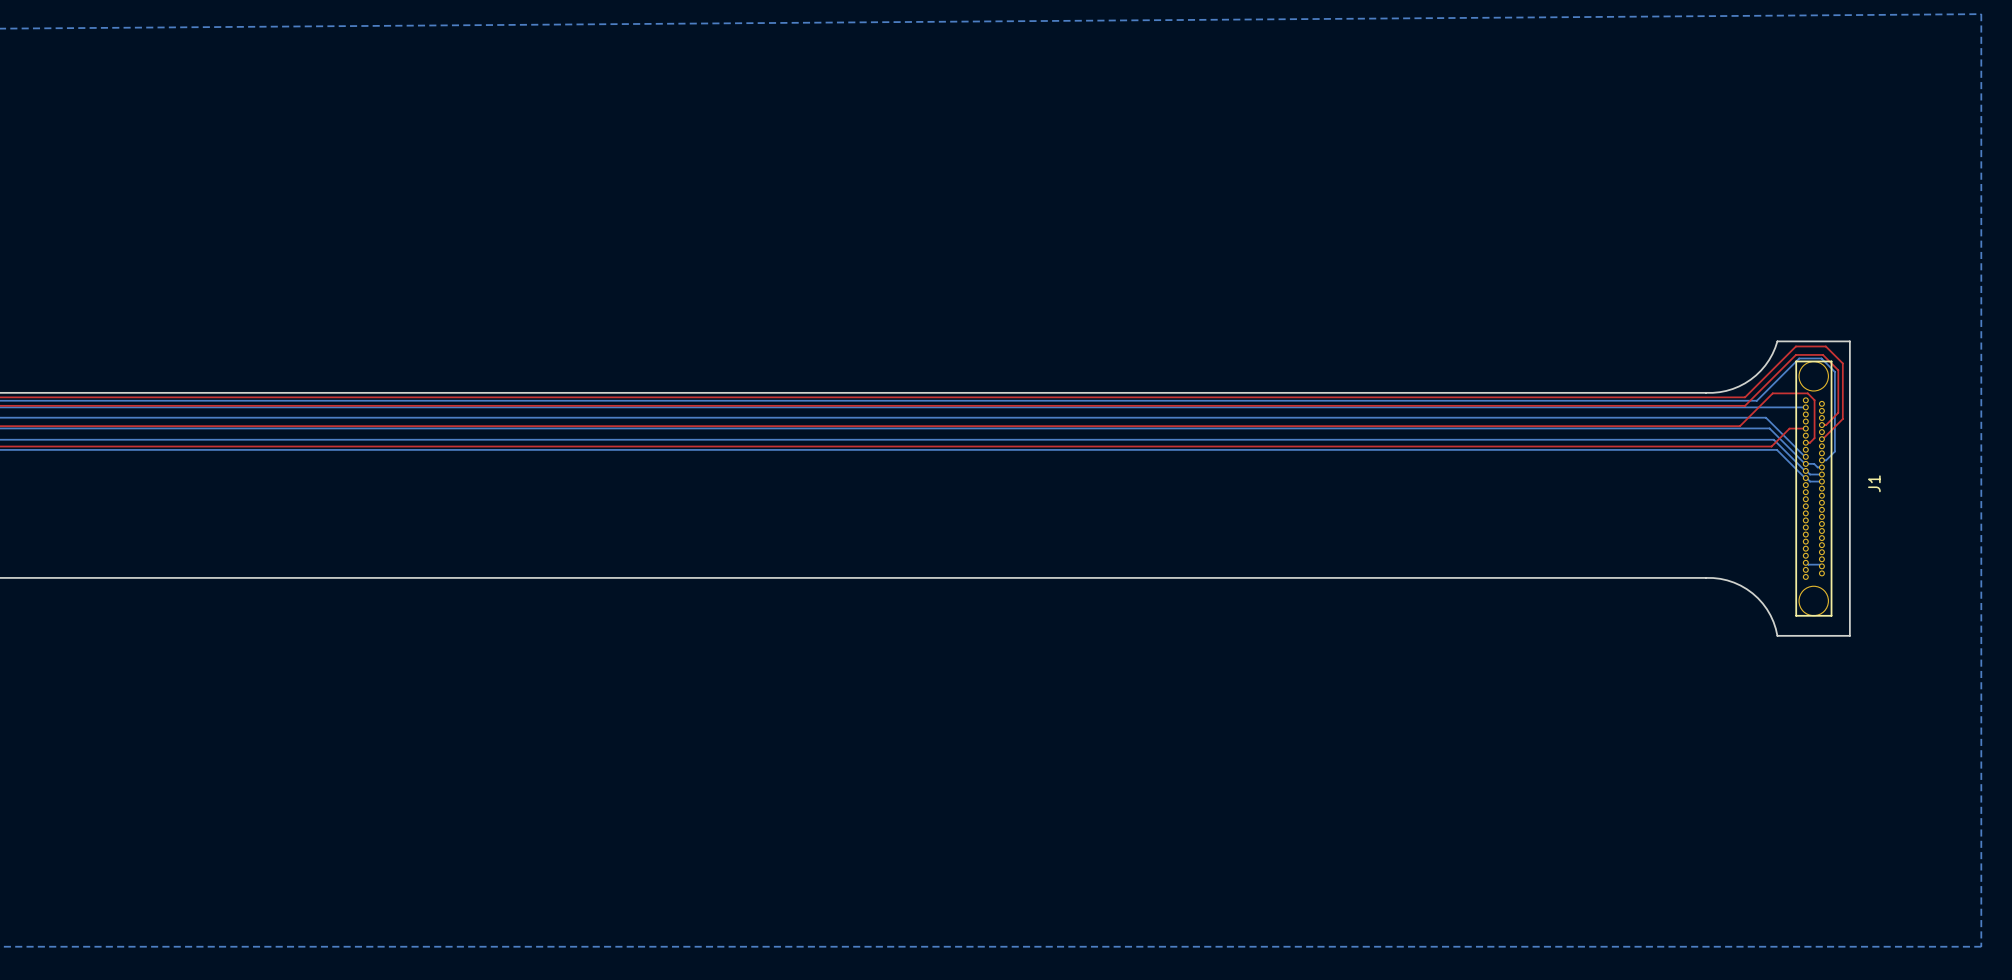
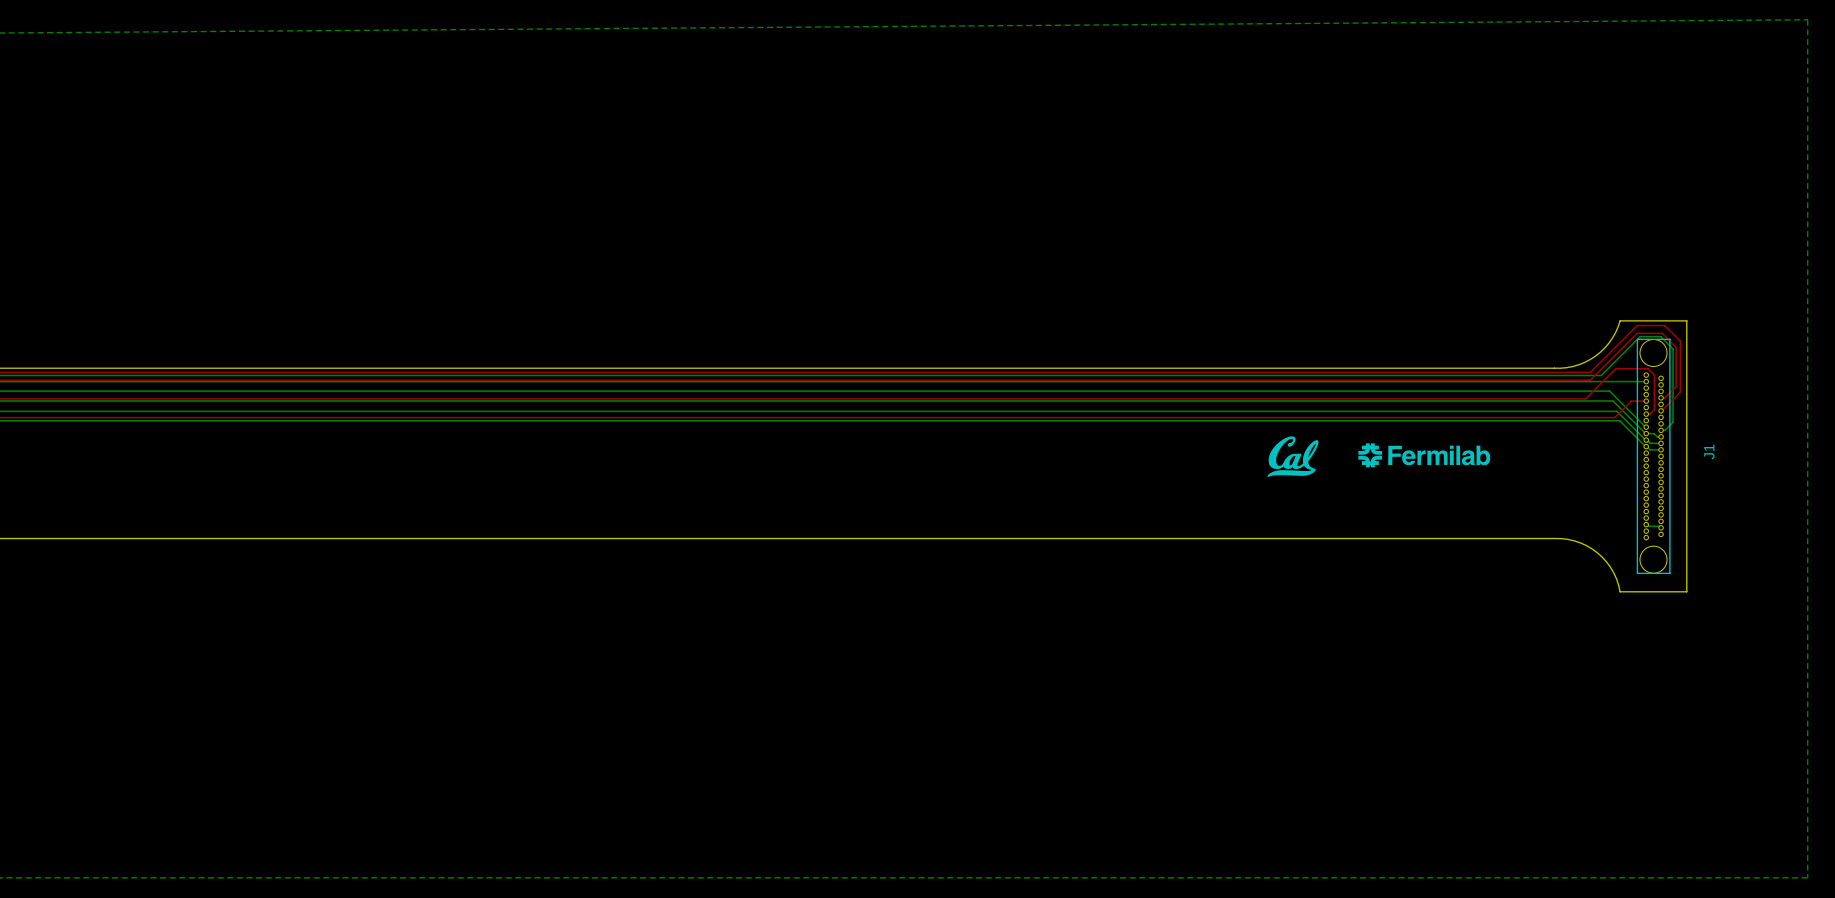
drawing: none -> [1267, 436, 1319, 477]
drawing: none -> [1358, 443, 1491, 468]

